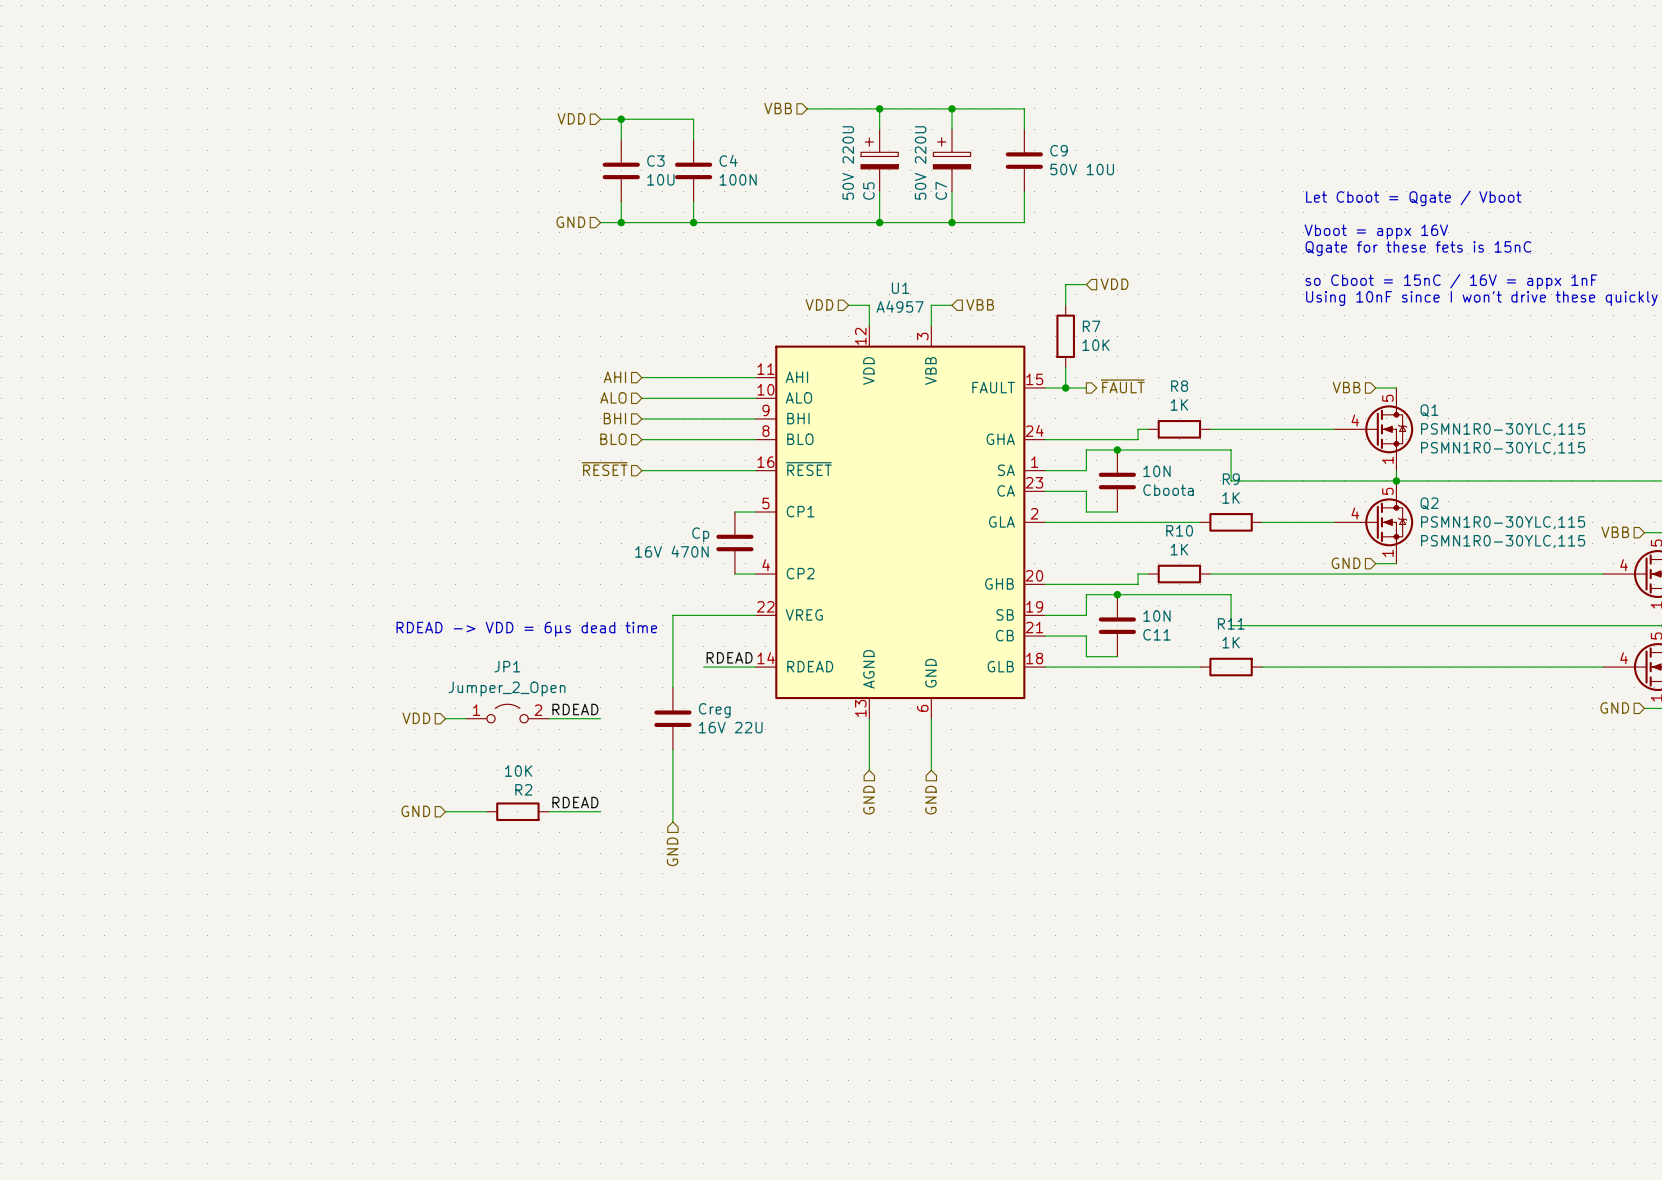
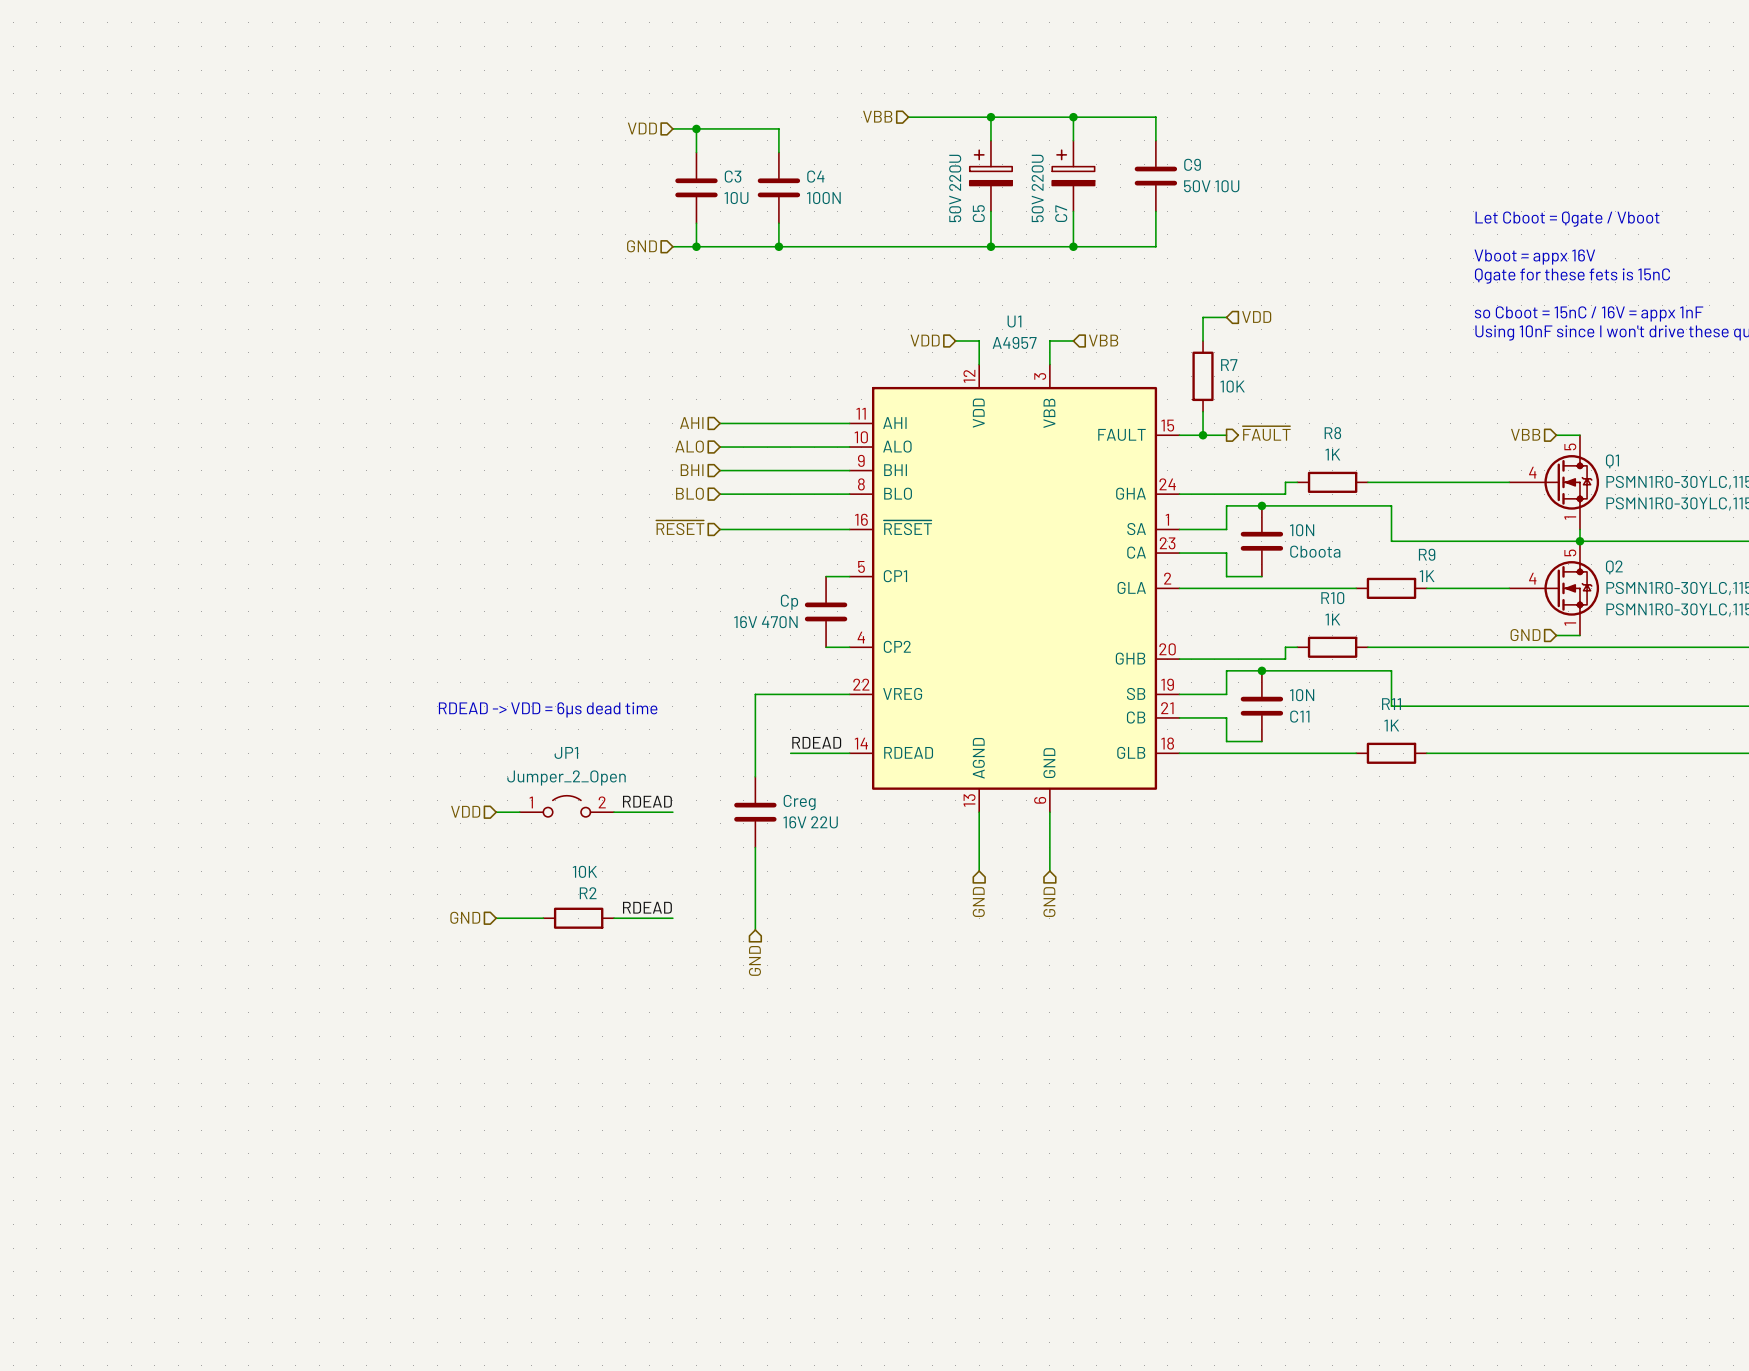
R9 name position: R9 (1231, 479) -> R9 (1427, 554)
R9 value position: 1K (1231, 497) -> 1K (1427, 576)

